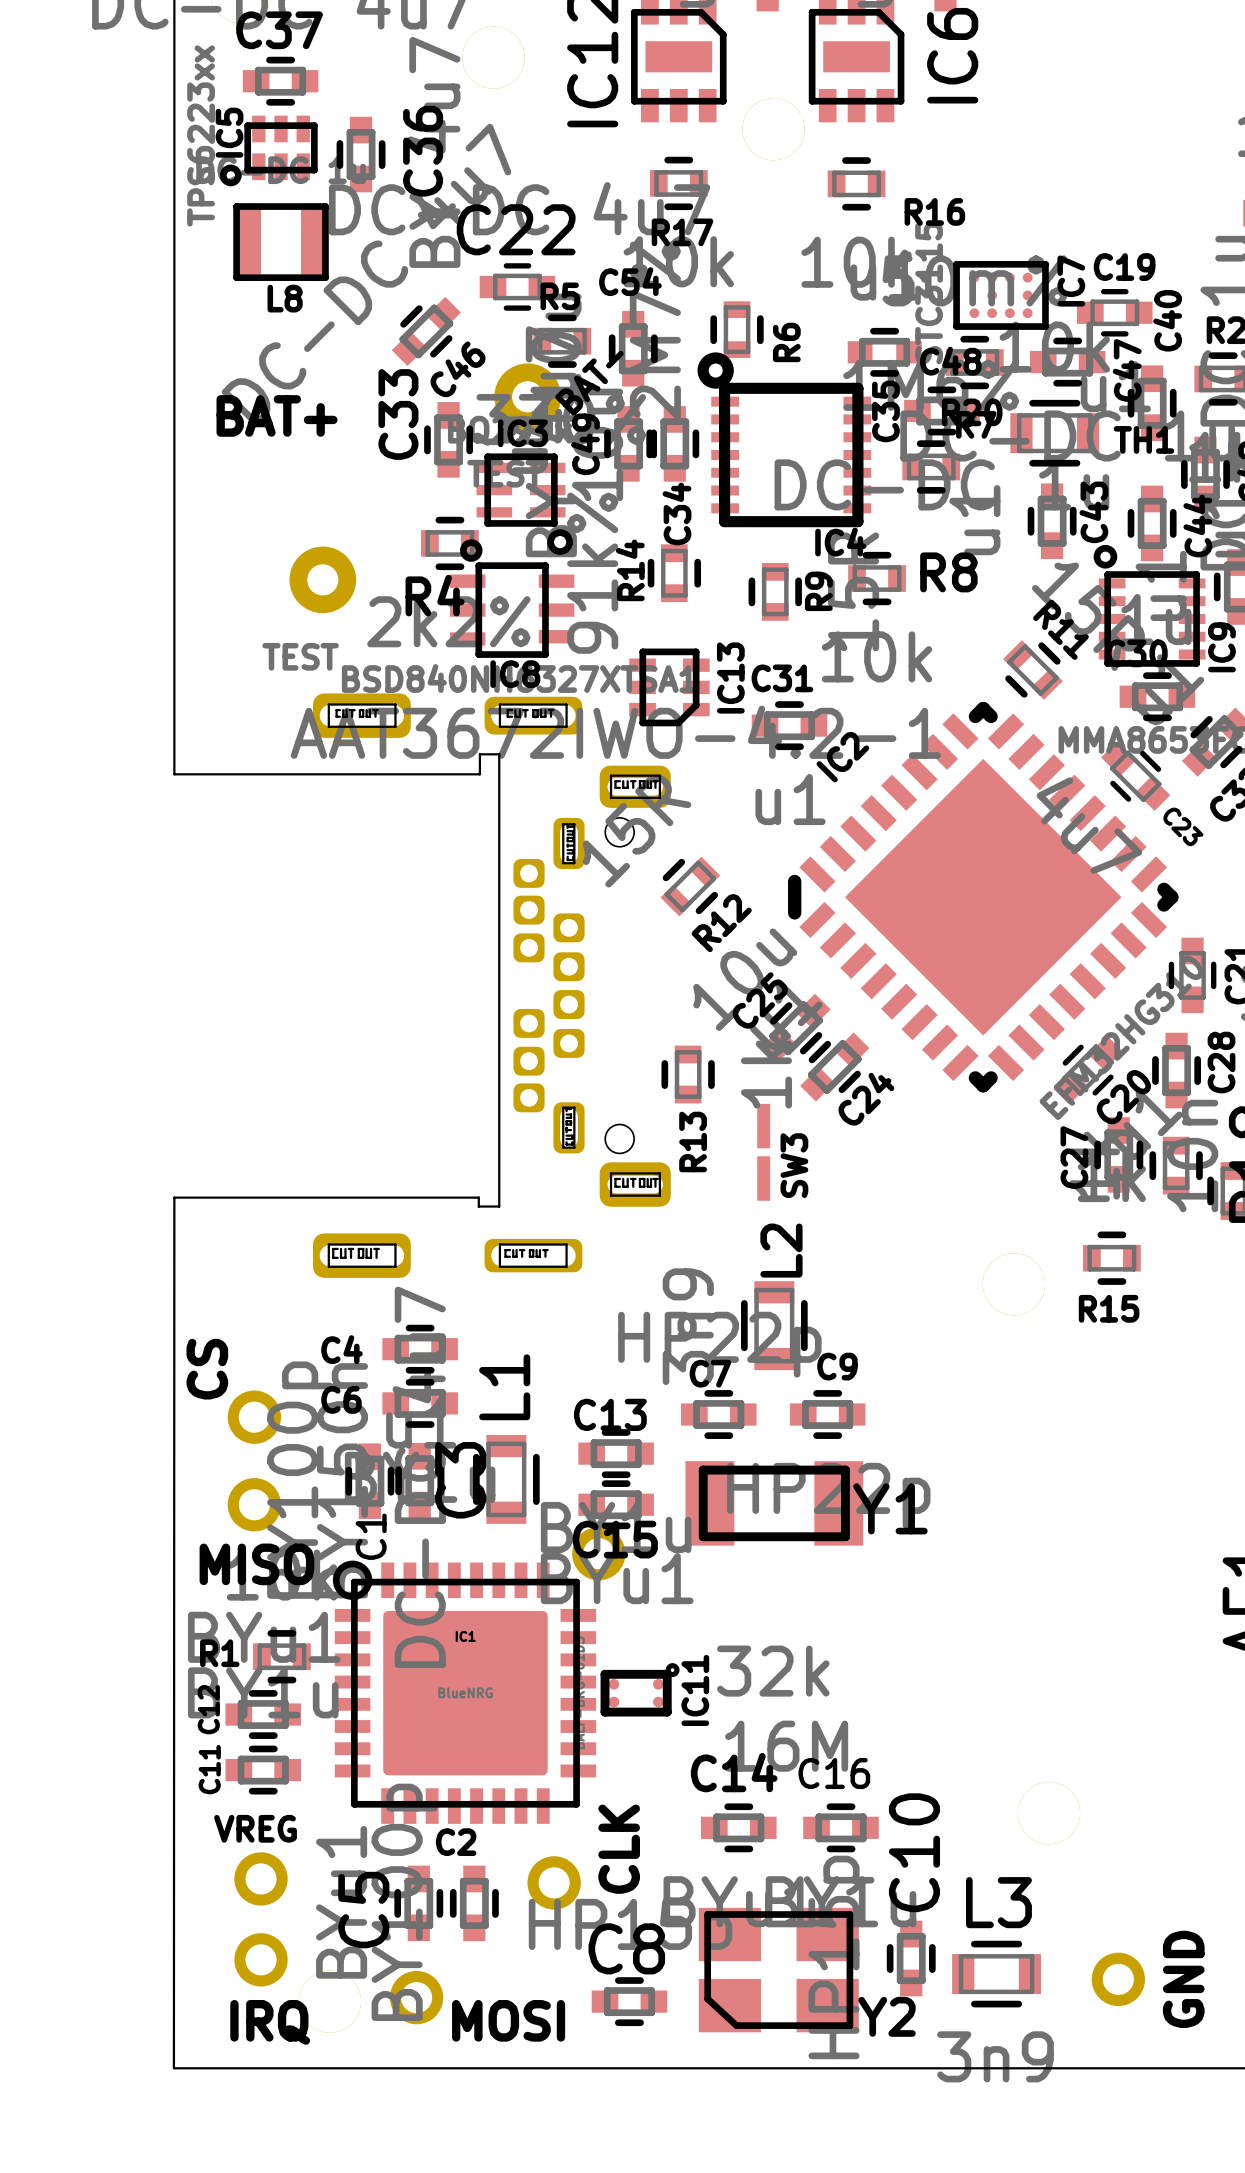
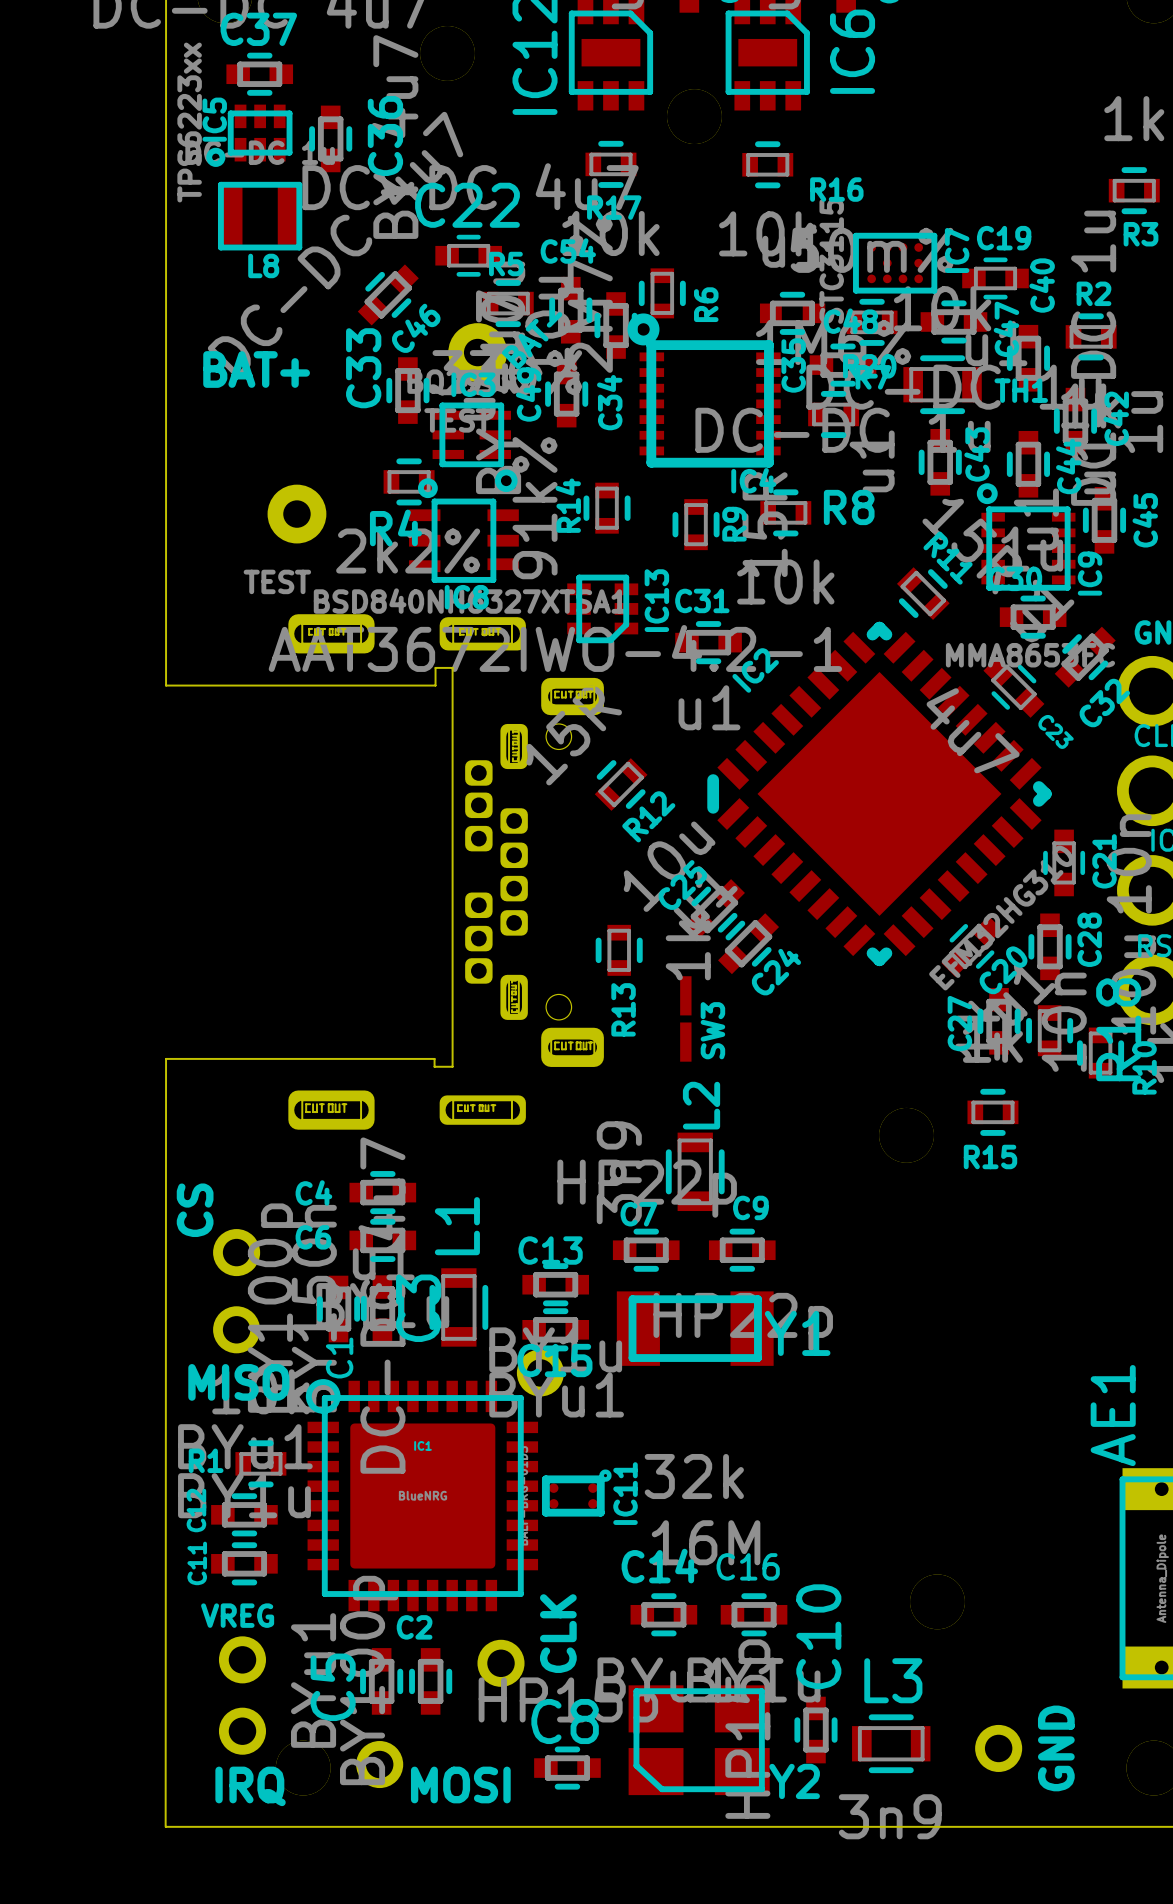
C34 position: (674, 443) -> (616, 325)
C34 name position: C34 (676, 514) -> C34 (609, 402)

